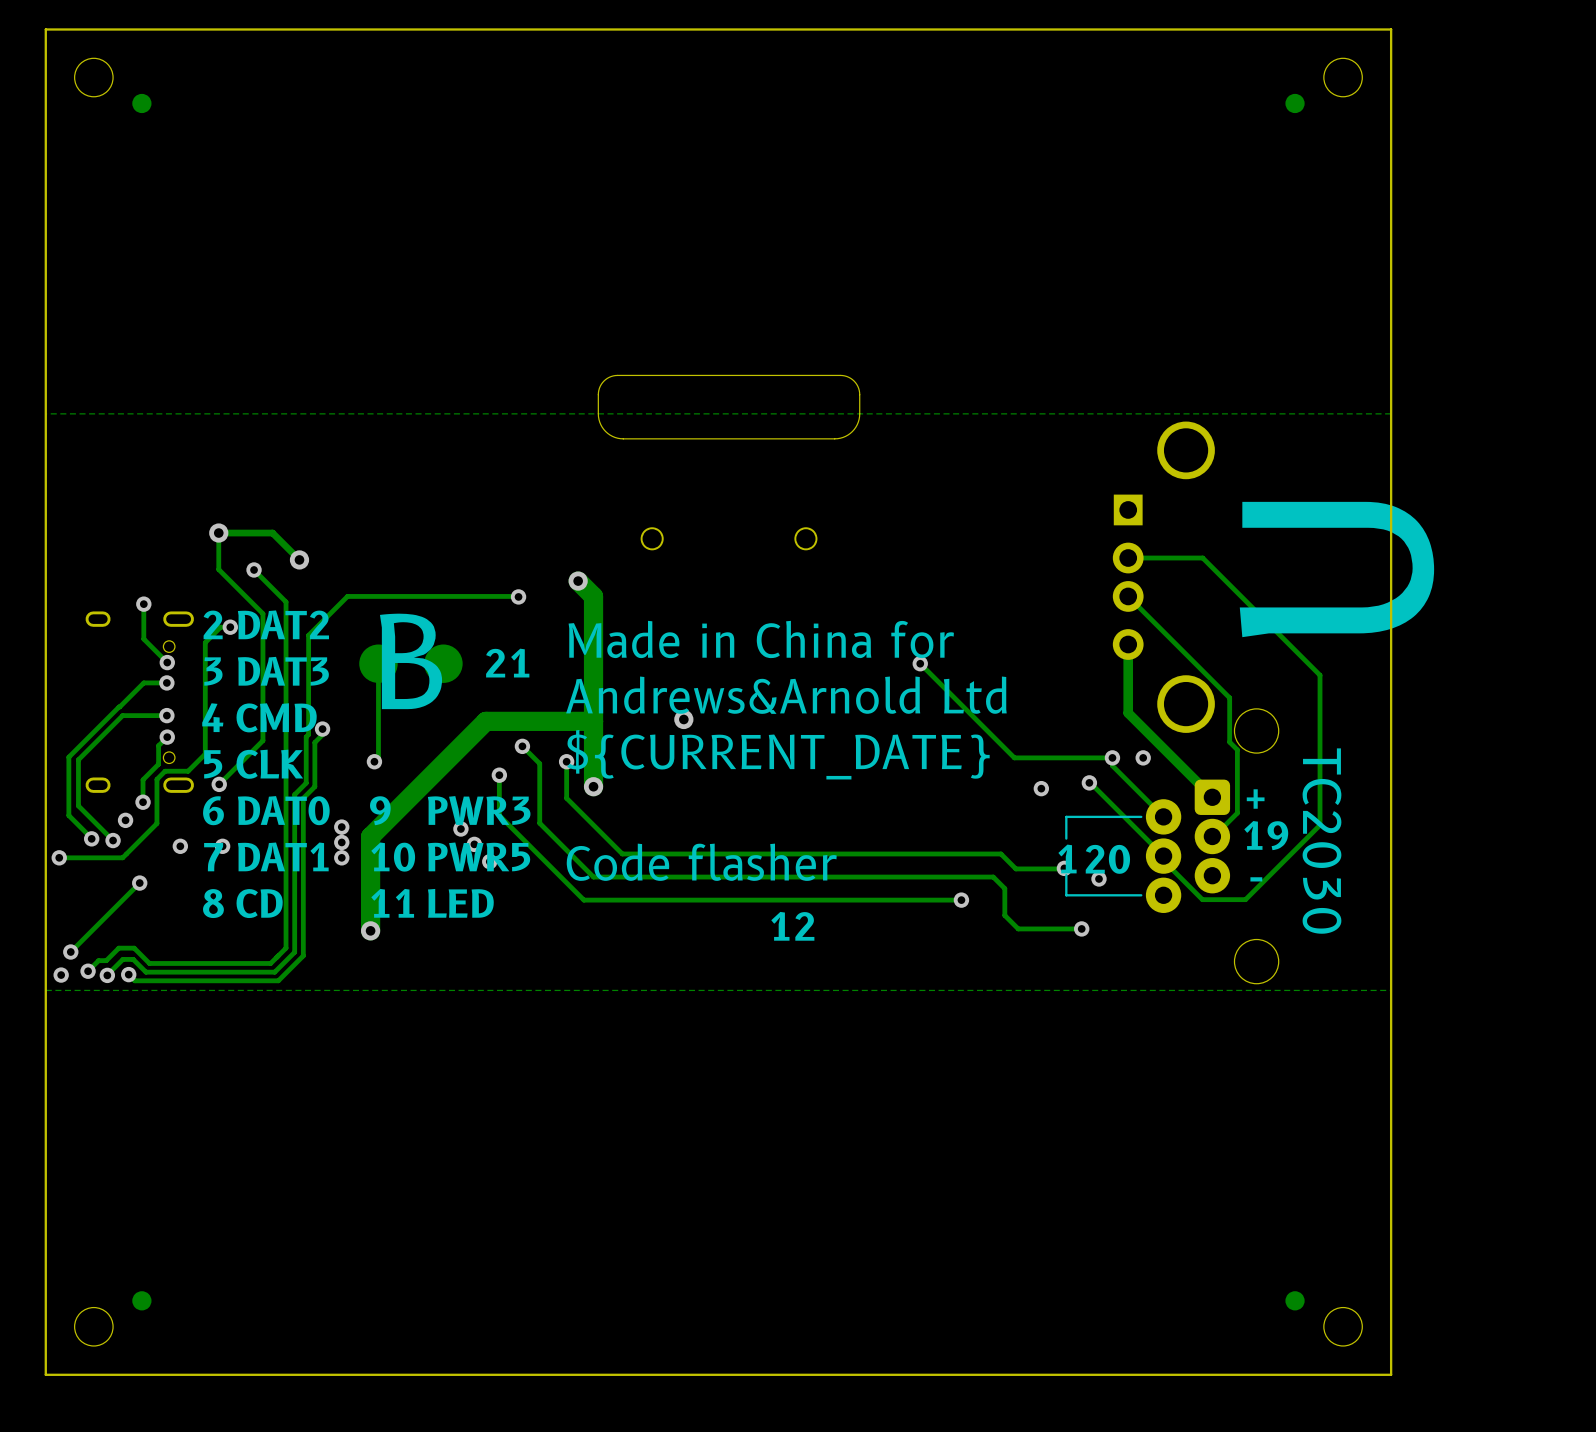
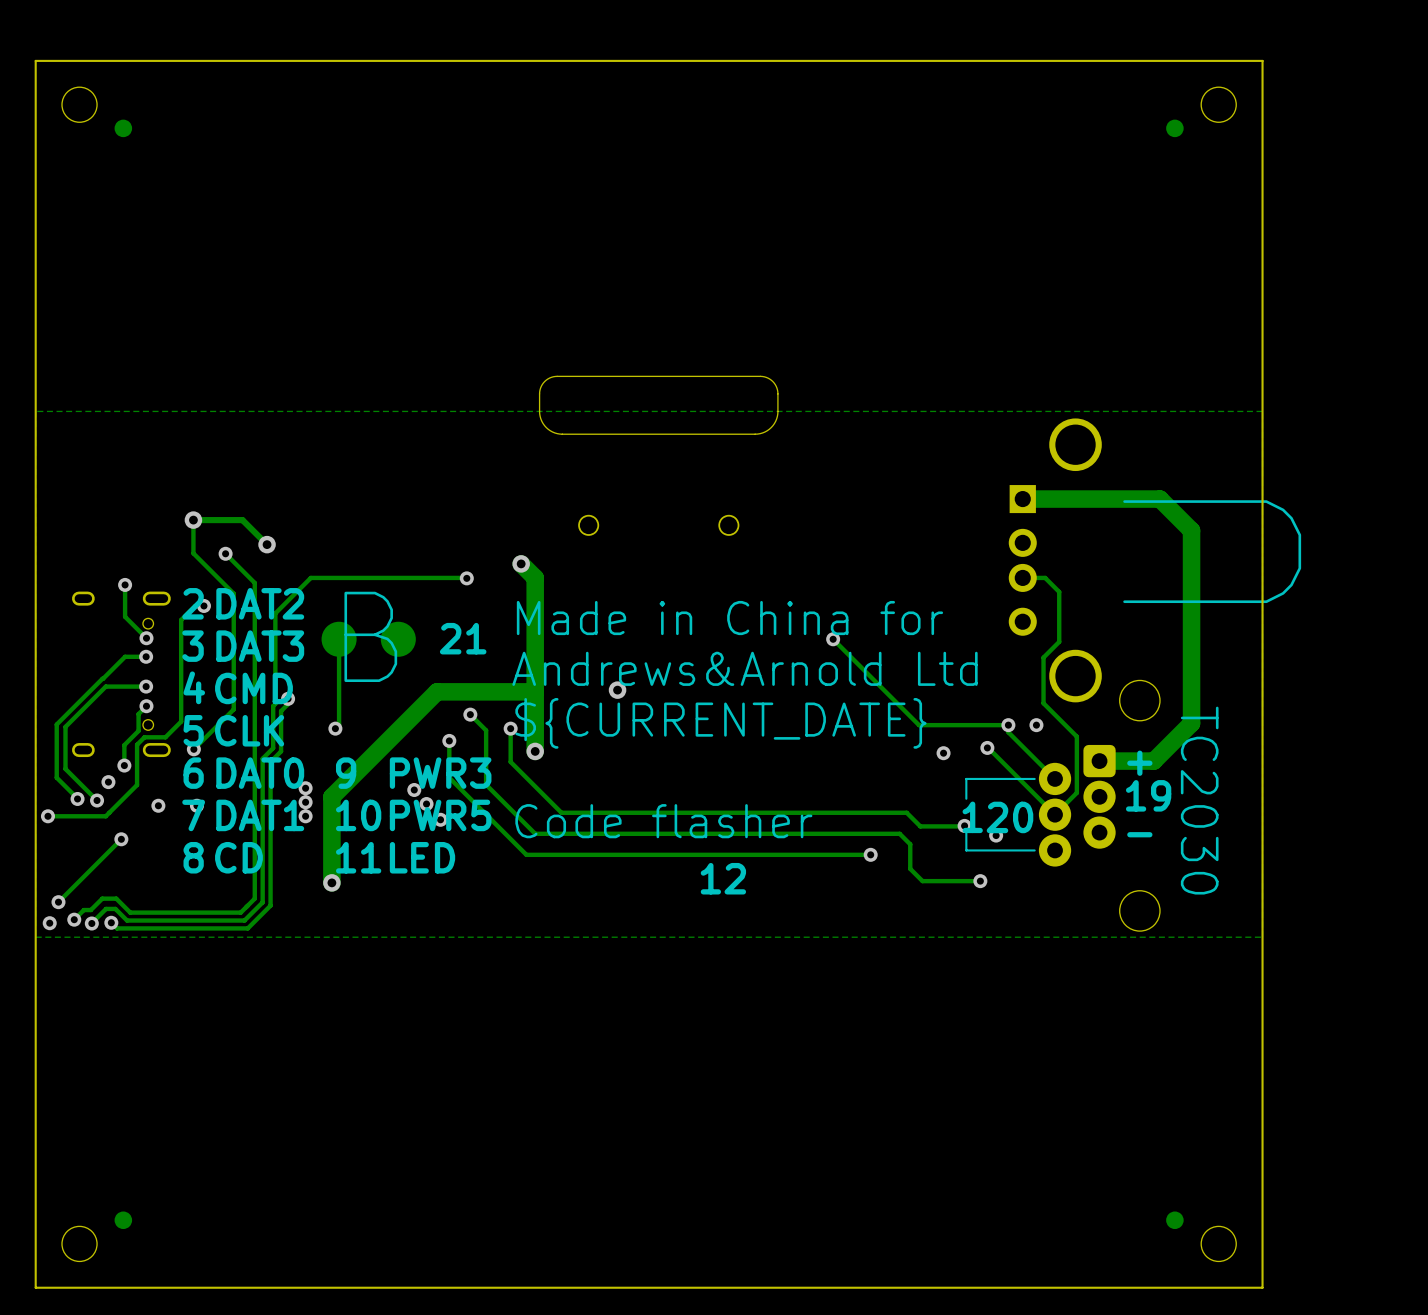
track: (1128, 558) (1202, 558) (1320, 675) (1320, 825) (1245, 899) (1202, 899) (1163, 860) -> none
track: (1128, 596) (1229, 697) (1229, 742) (1237, 749) (1237, 813) (1214, 836) -> (1022, 577) (1045, 577) (1059, 591) (1059, 641) (1043, 657) (1043, 703) (1076, 736) (1076, 792) (1055, 814)
track: (1128, 644) (1128, 713) (1212, 797) -> (1022, 499) (1160, 499) (1191, 530) (1191, 723) (1153, 761) (1099, 761)

